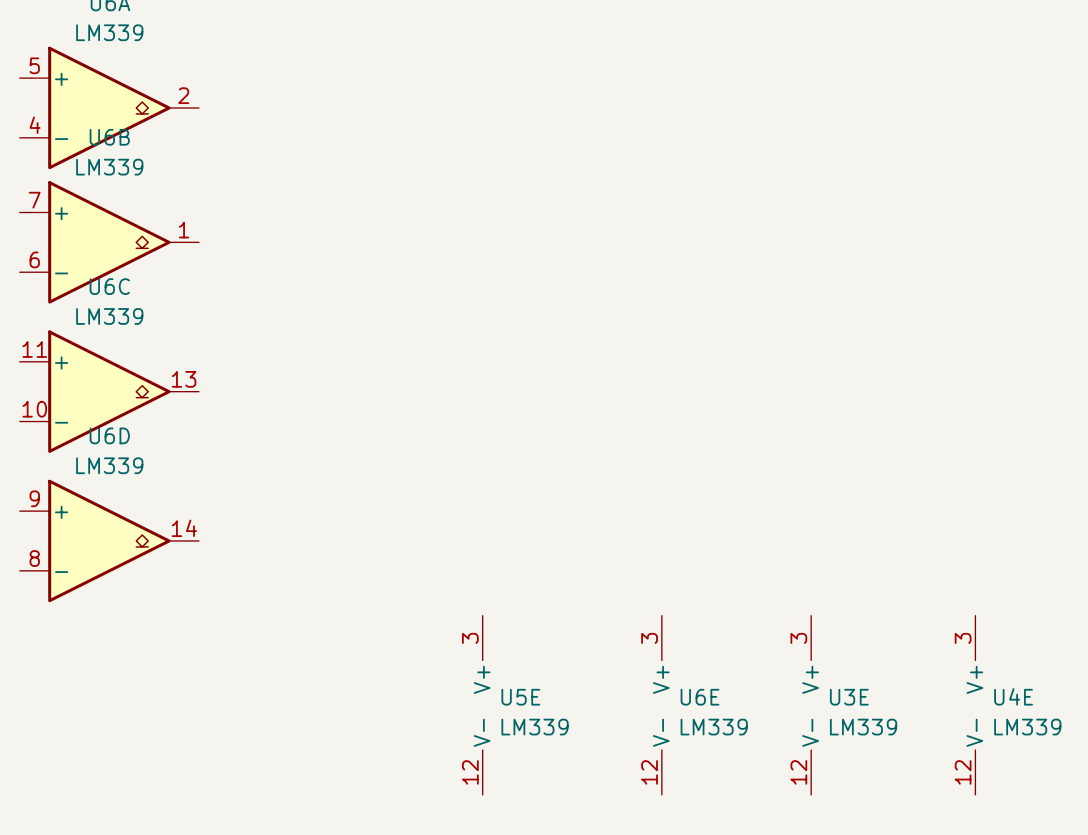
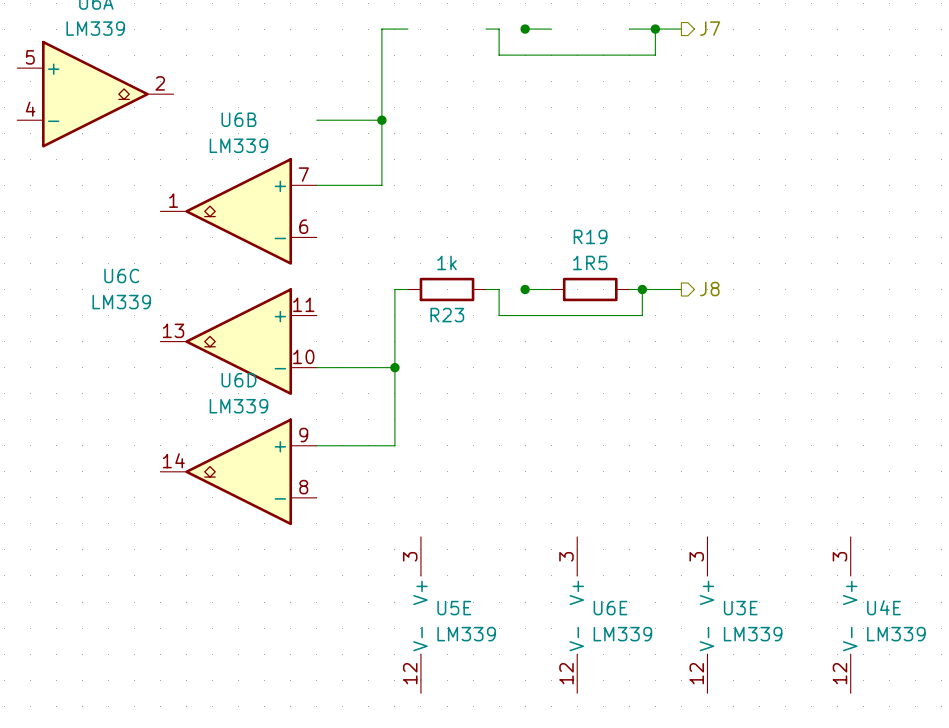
hierarchical label: none -> J7 (710, 28)
wire: none -> (407, 29) (381, 29) (381, 185) (316, 185)
wire: none -> (486, 29) (499, 29) (499, 55) (655, 55) (655, 29)
wire: none -> (525, 29) (551, 29)
junction: none -> (525, 29)
wire: none -> (629, 29) (681, 29)
junction: none -> (655, 29)
wire: none -> (316, 120) (381, 120)
junction: none -> (381, 120)
U6B flip: as is (109, 242) -> left-right (238, 211)
U6B position: (109, 242) -> (238, 211)
U6C name position: U6C (109, 286) -> U6C (121, 275)
U6C value position: LM339 (109, 316) -> LM339 (121, 302)
wire: none -> (407, 289) (394, 289) (394, 445) (316, 445)
R23: none -> 1k (447, 289)
wire: none -> (486, 289) (499, 289) (499, 315) (642, 315) (642, 289)
wire: none -> (525, 289) (551, 289)
junction: none -> (525, 289)
R19: none -> 1R5 (590, 289)
wire: none -> (629, 289) (681, 289)
junction: none -> (642, 289)
hierarchical label: none -> J8 (709, 289)
U6C flip: as is (109, 391) -> left-right (238, 341)
U6C position: (109, 391) -> (238, 341)
wire: none -> (316, 367) (394, 367)
junction: none -> (394, 367)
U6D flip: as is (109, 540) -> left-right (238, 471)
U6D position: (109, 540) -> (238, 471)

